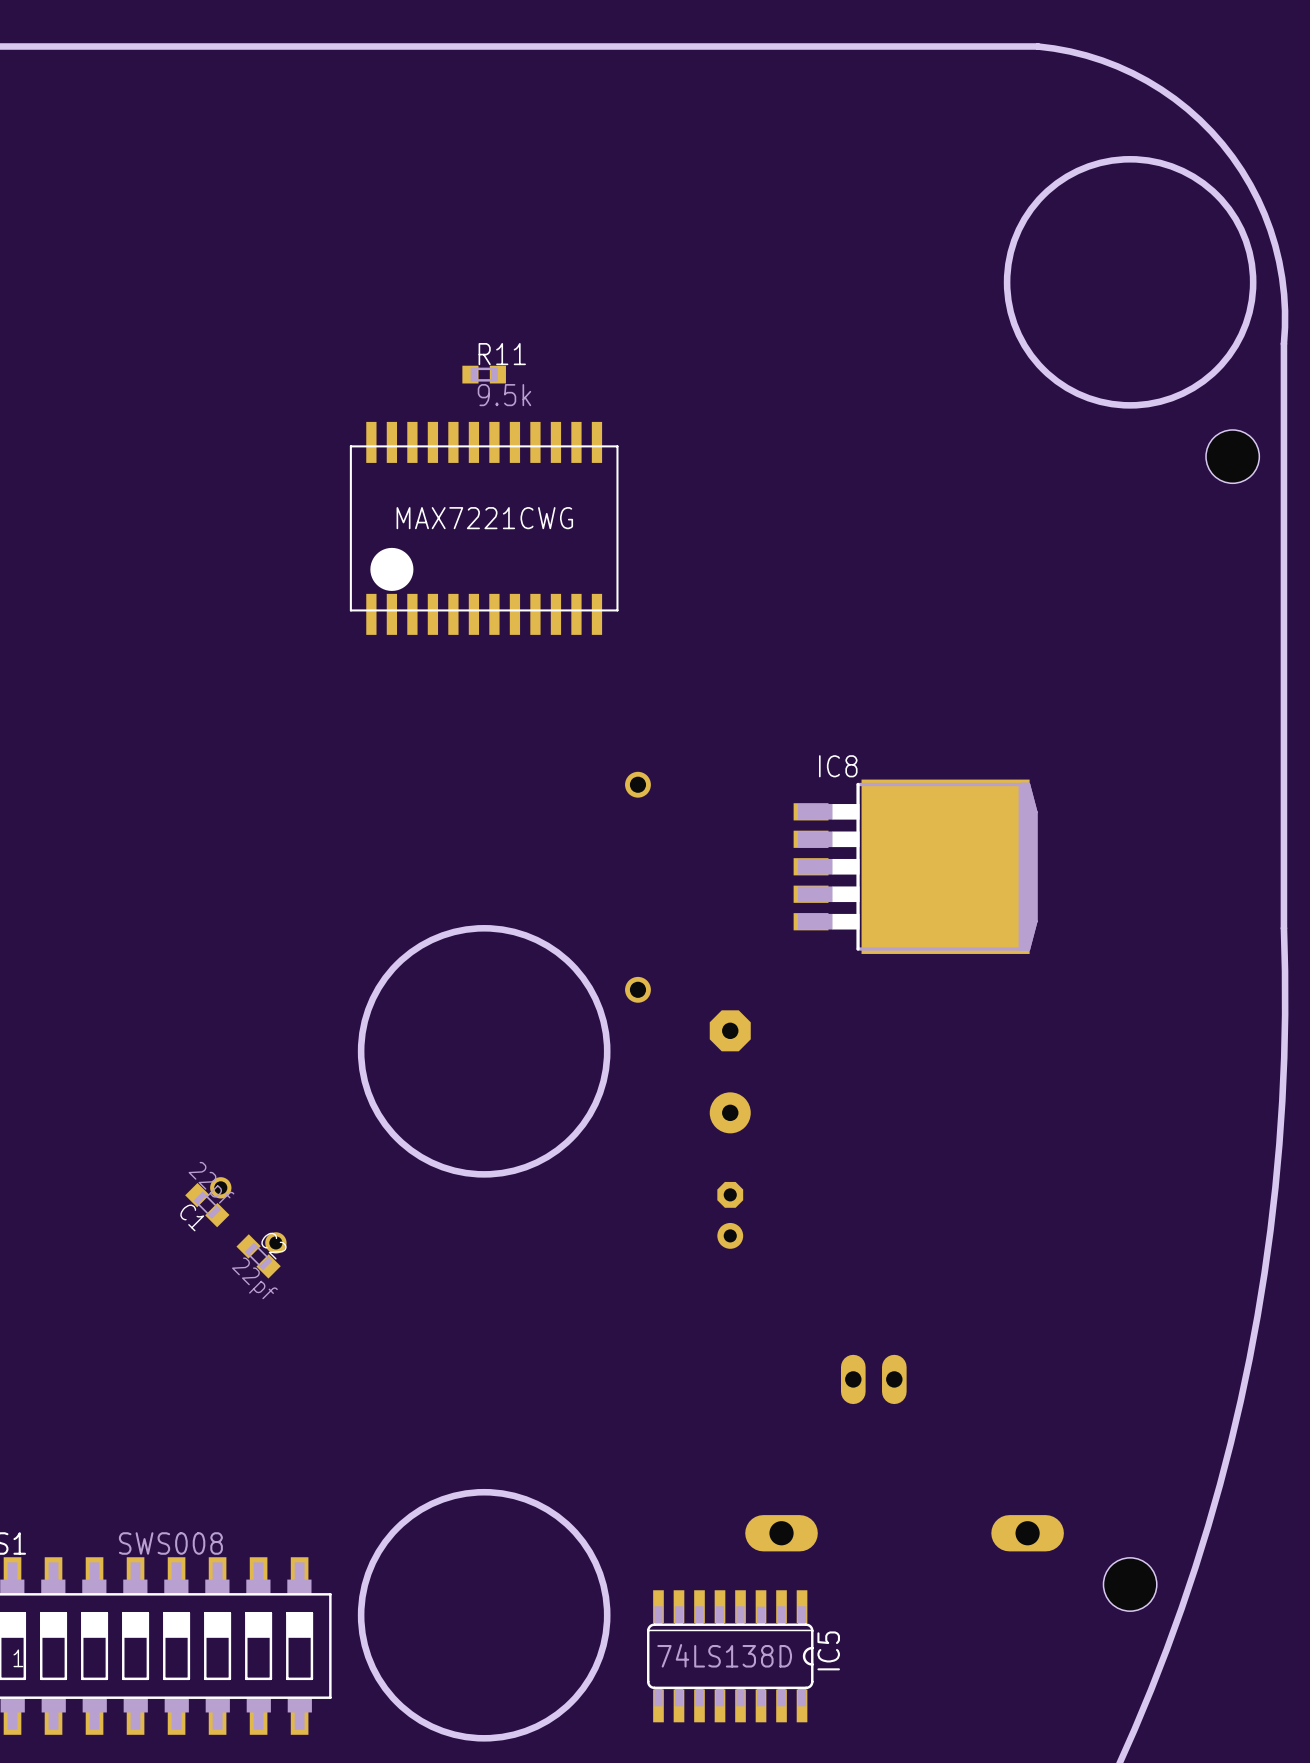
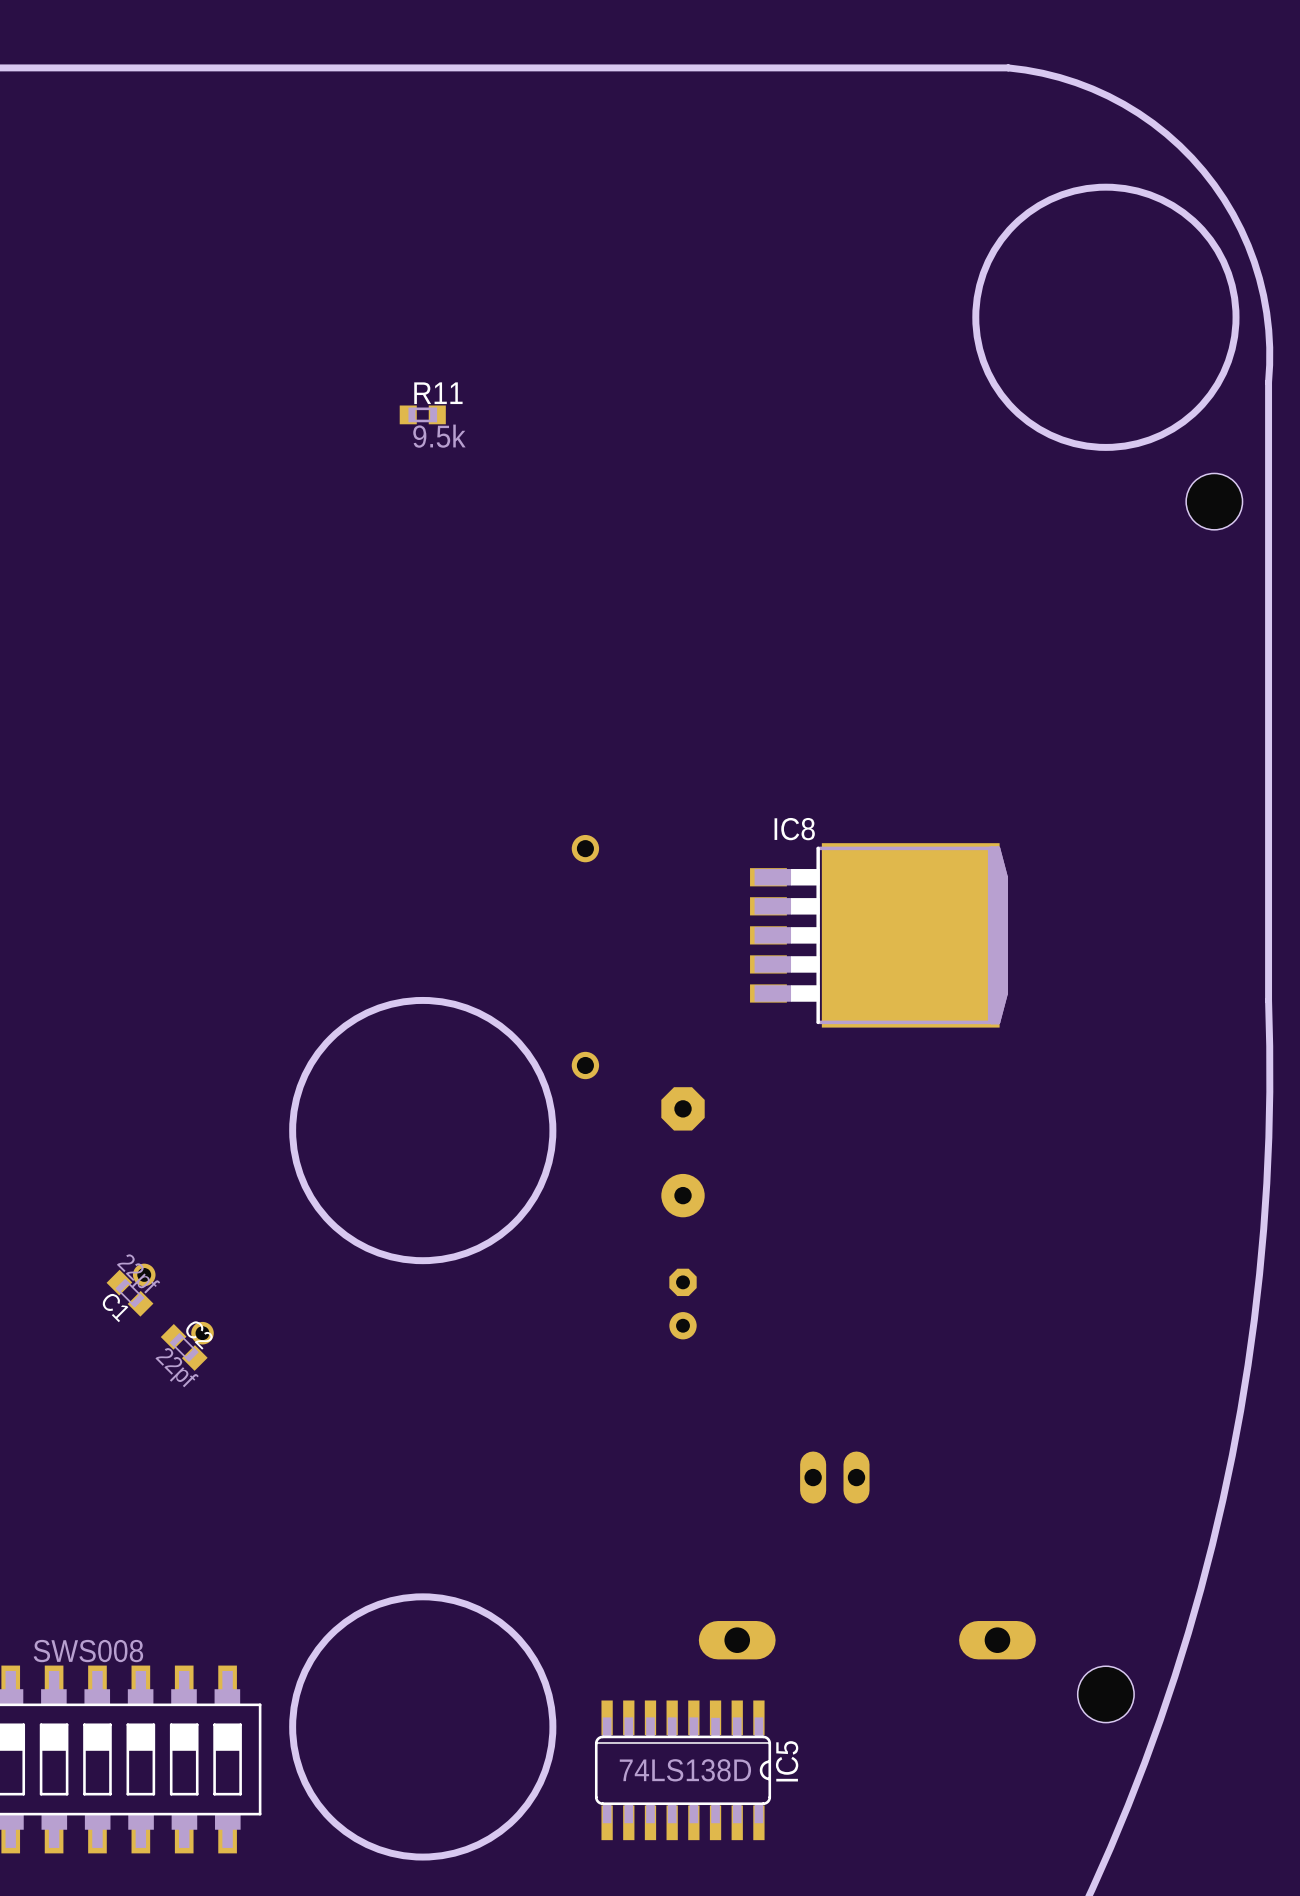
part: (484, 528) -> none

